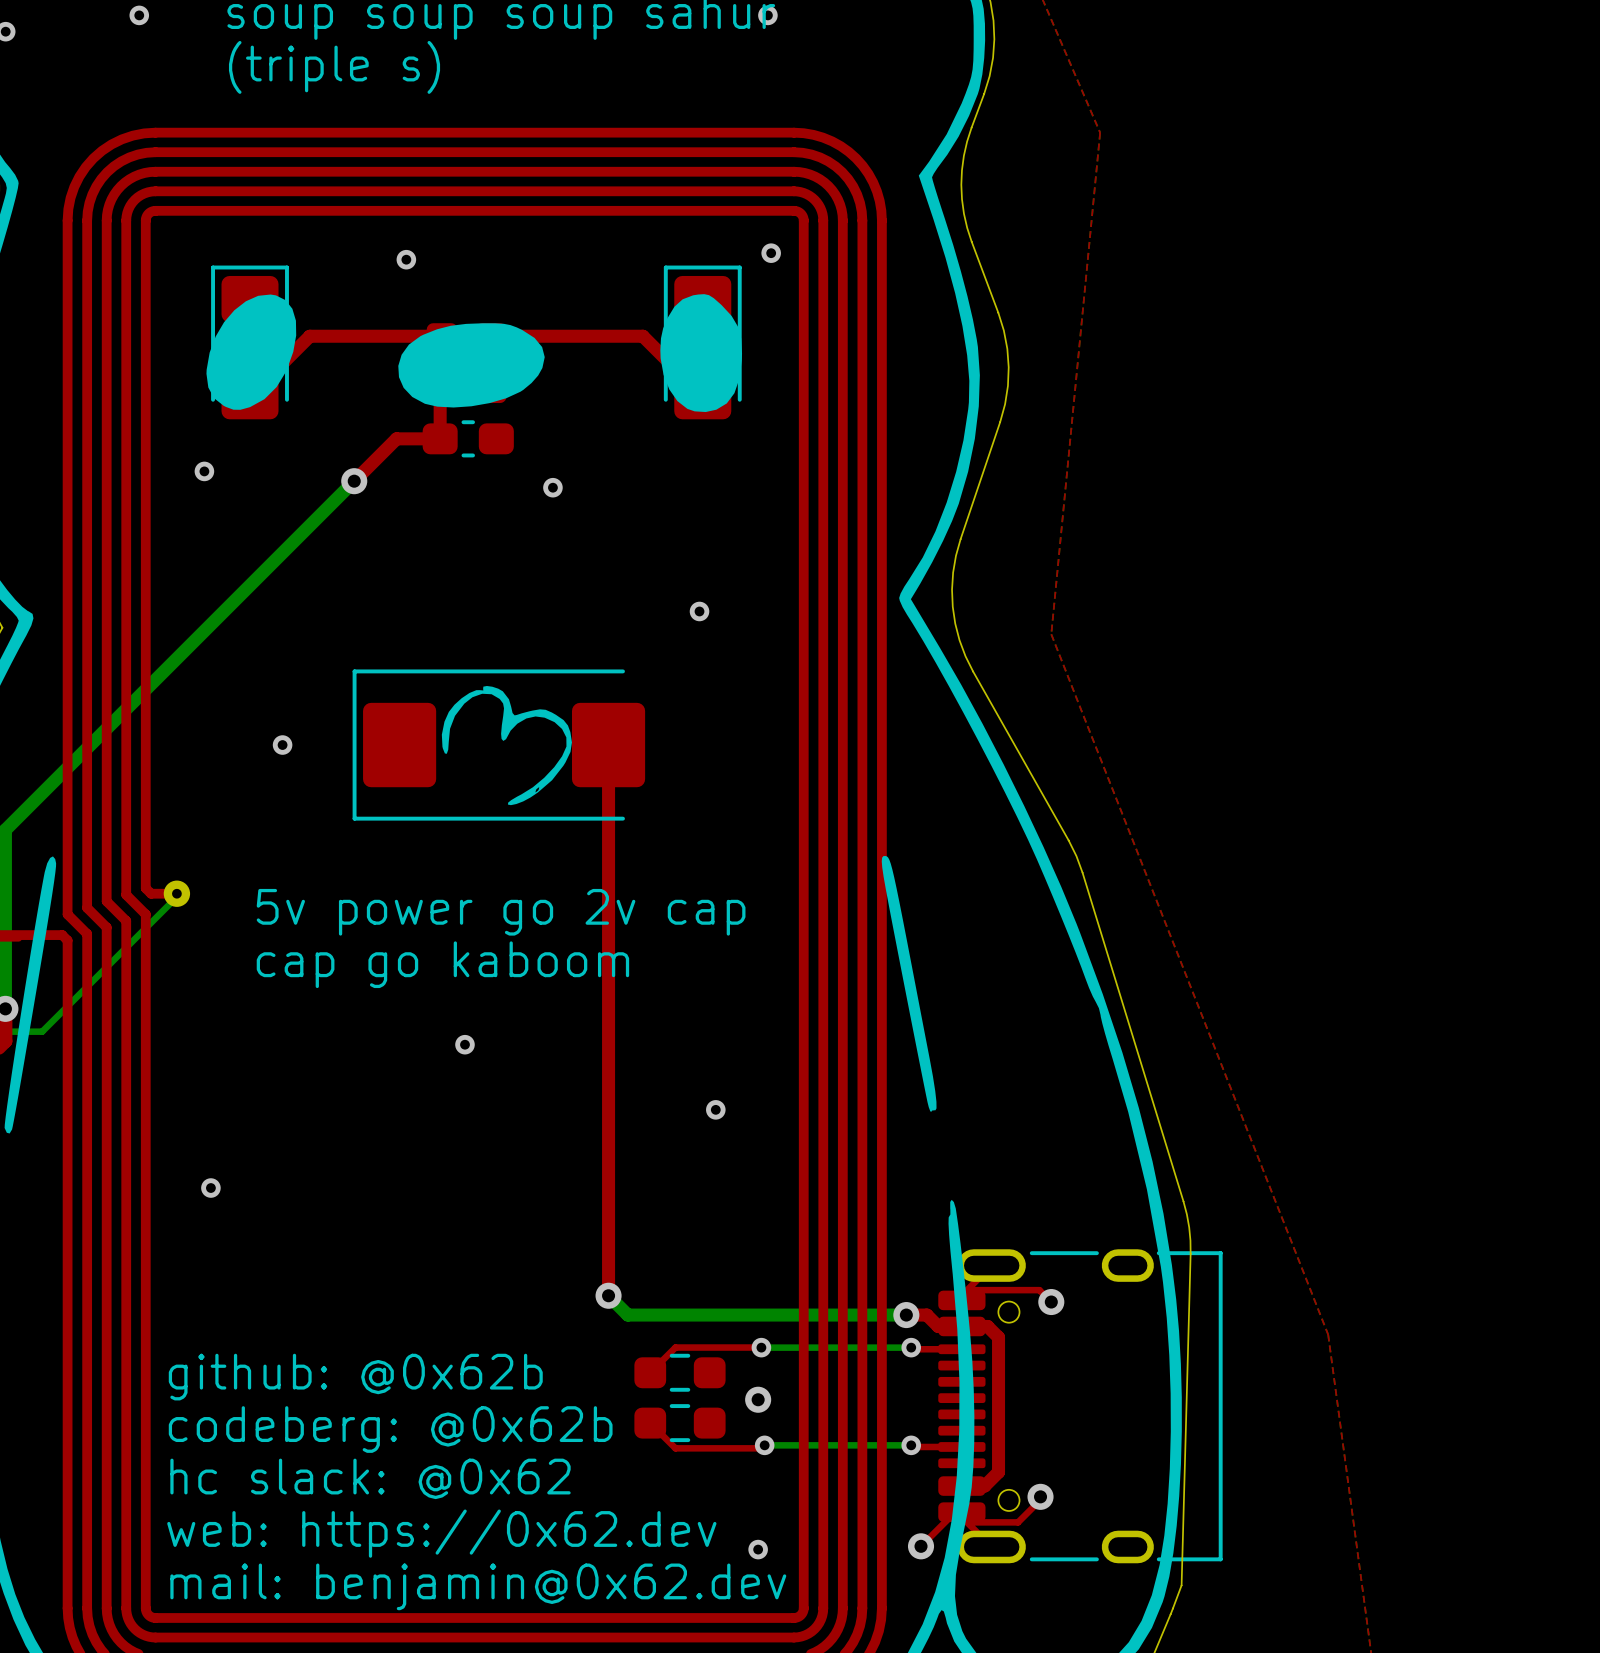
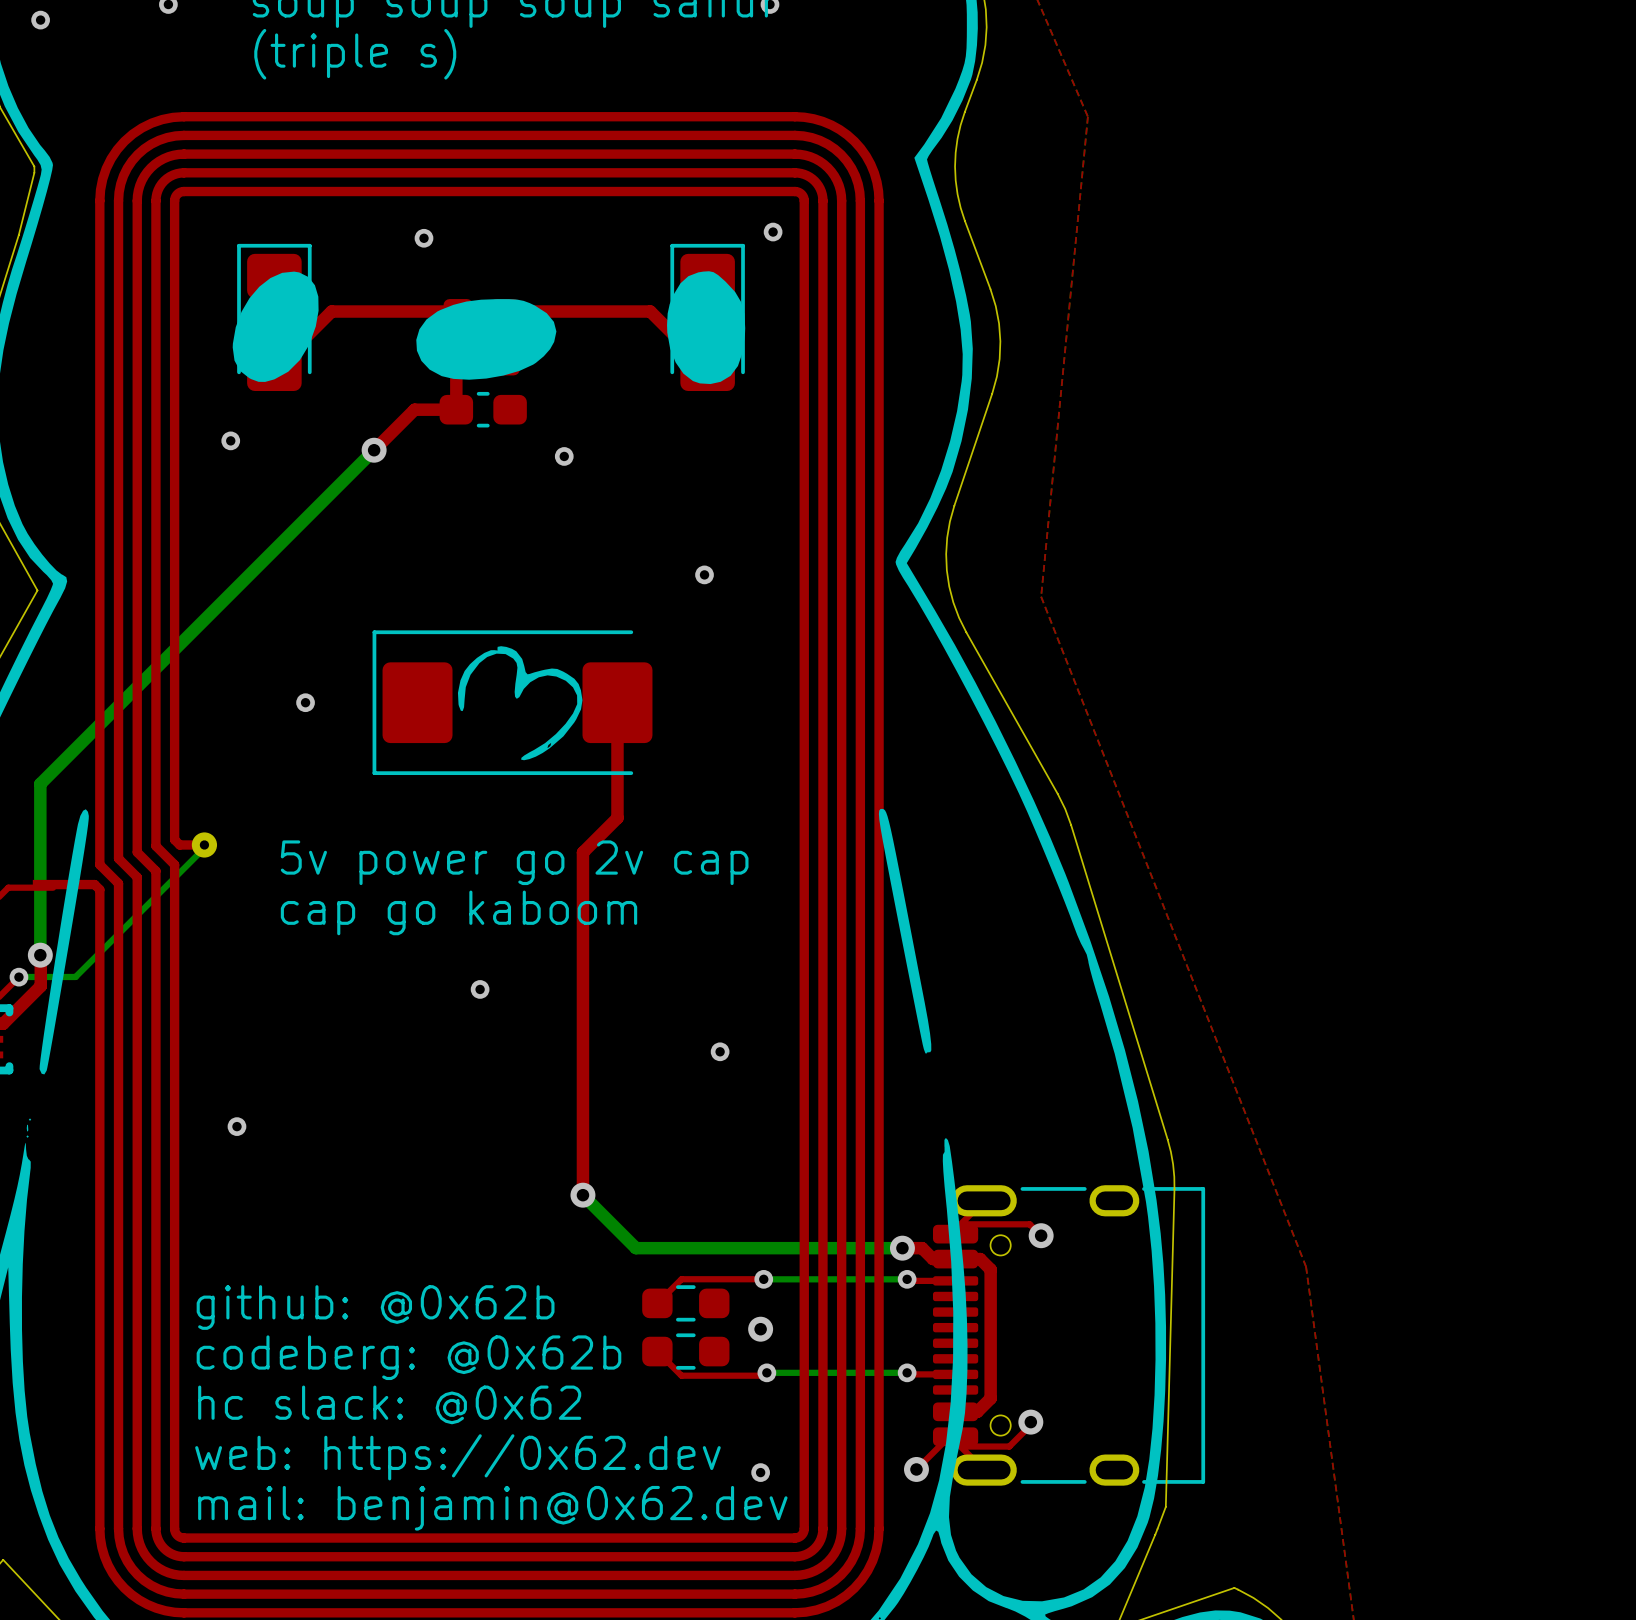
top track: (608, 865) (608, 1295) -> (617, 818) (582, 852) (582, 1195)
bottom track: none -> (582, 1195) (617, 1229)
via position: (608, 1295) -> (582, 1195)

